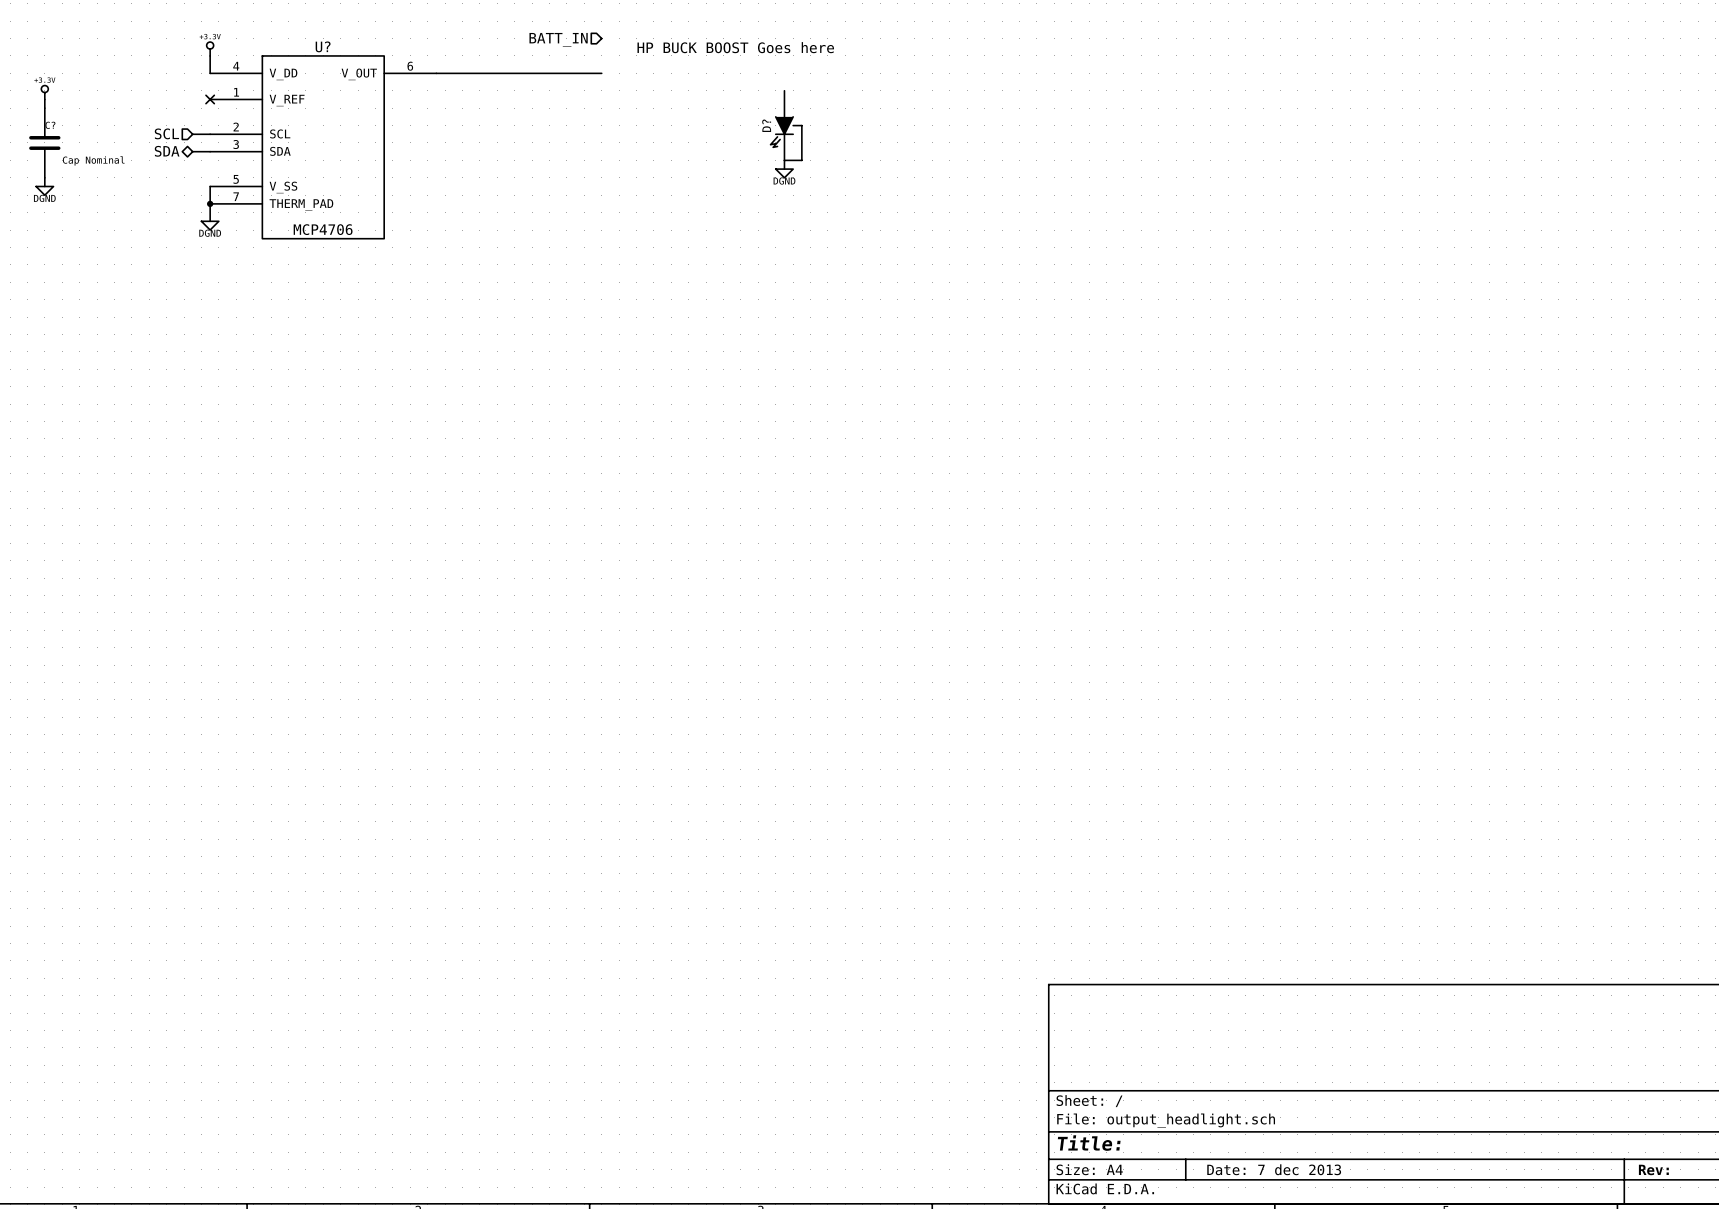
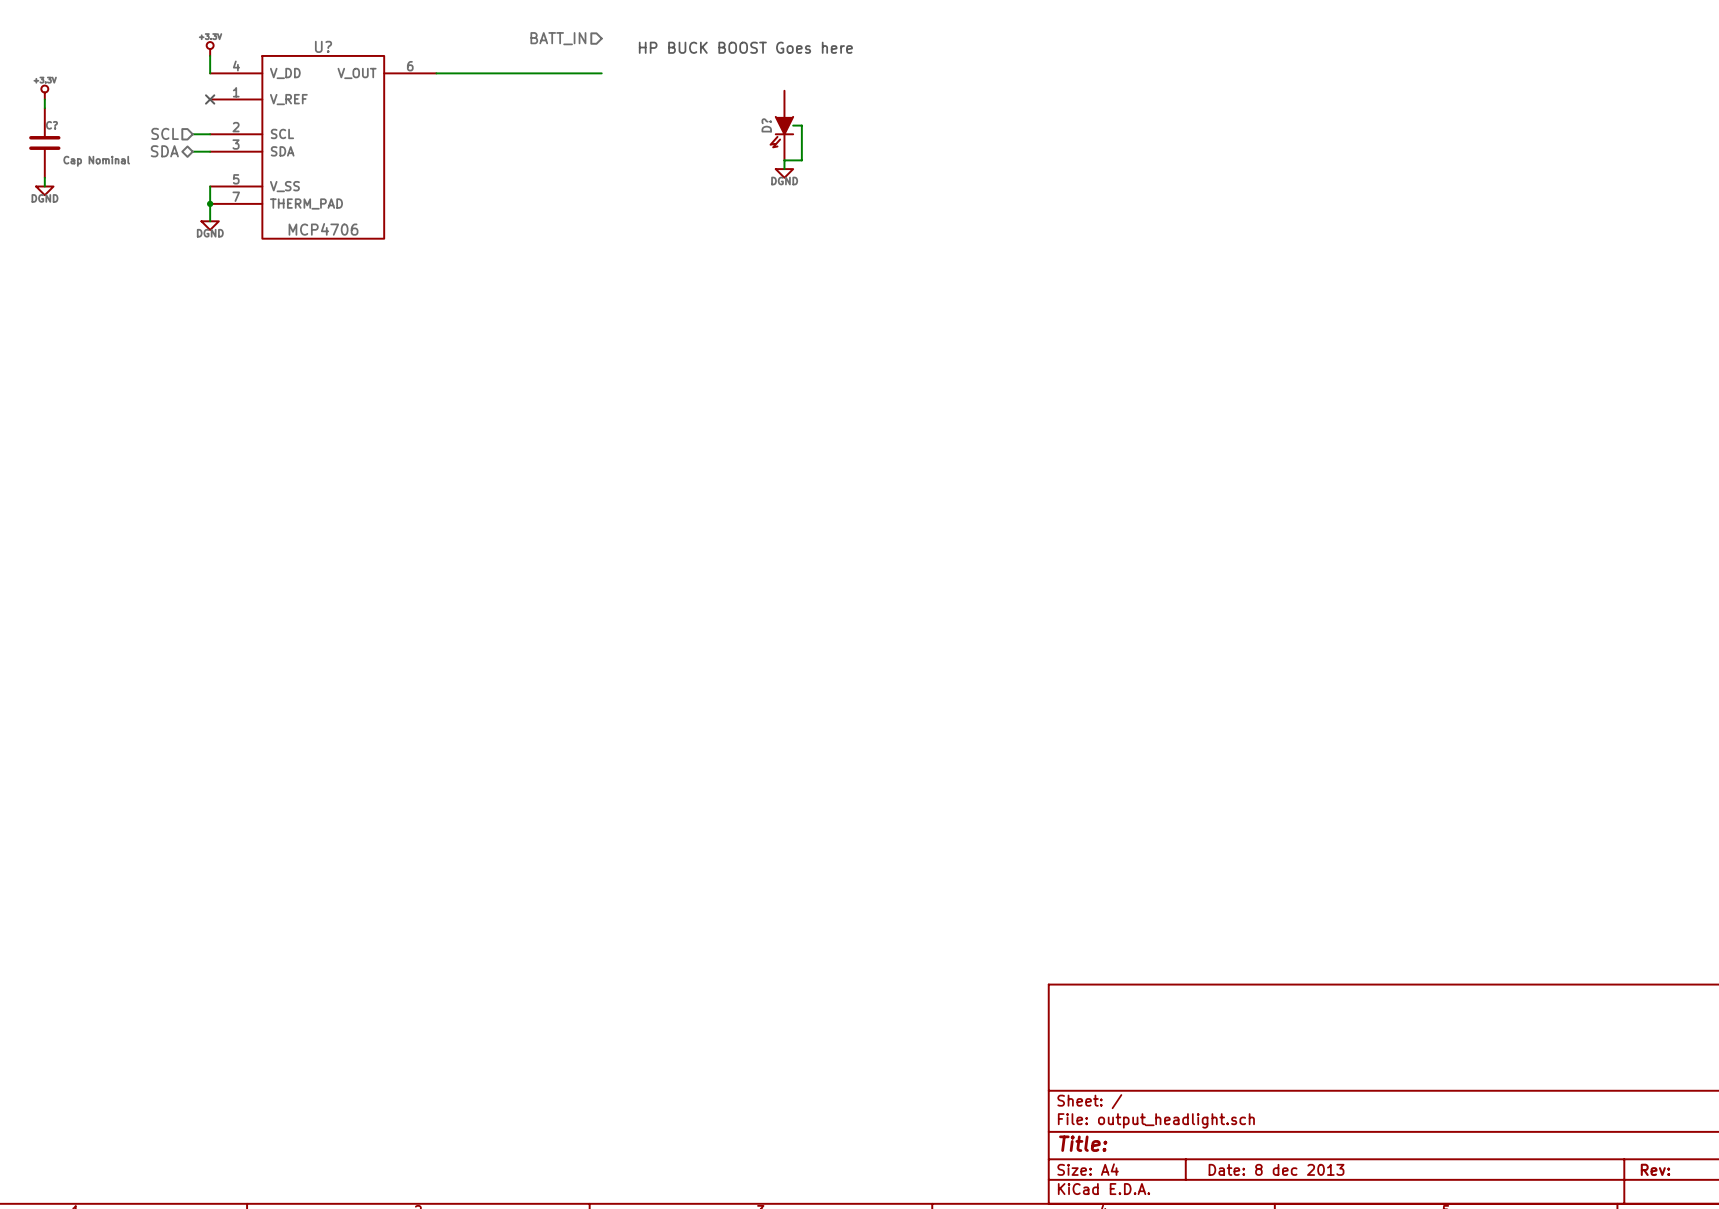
title block: Date: 7 dec 2013 (1274, 1169) -> Date: 8 dec 2013 (1276, 1169)

